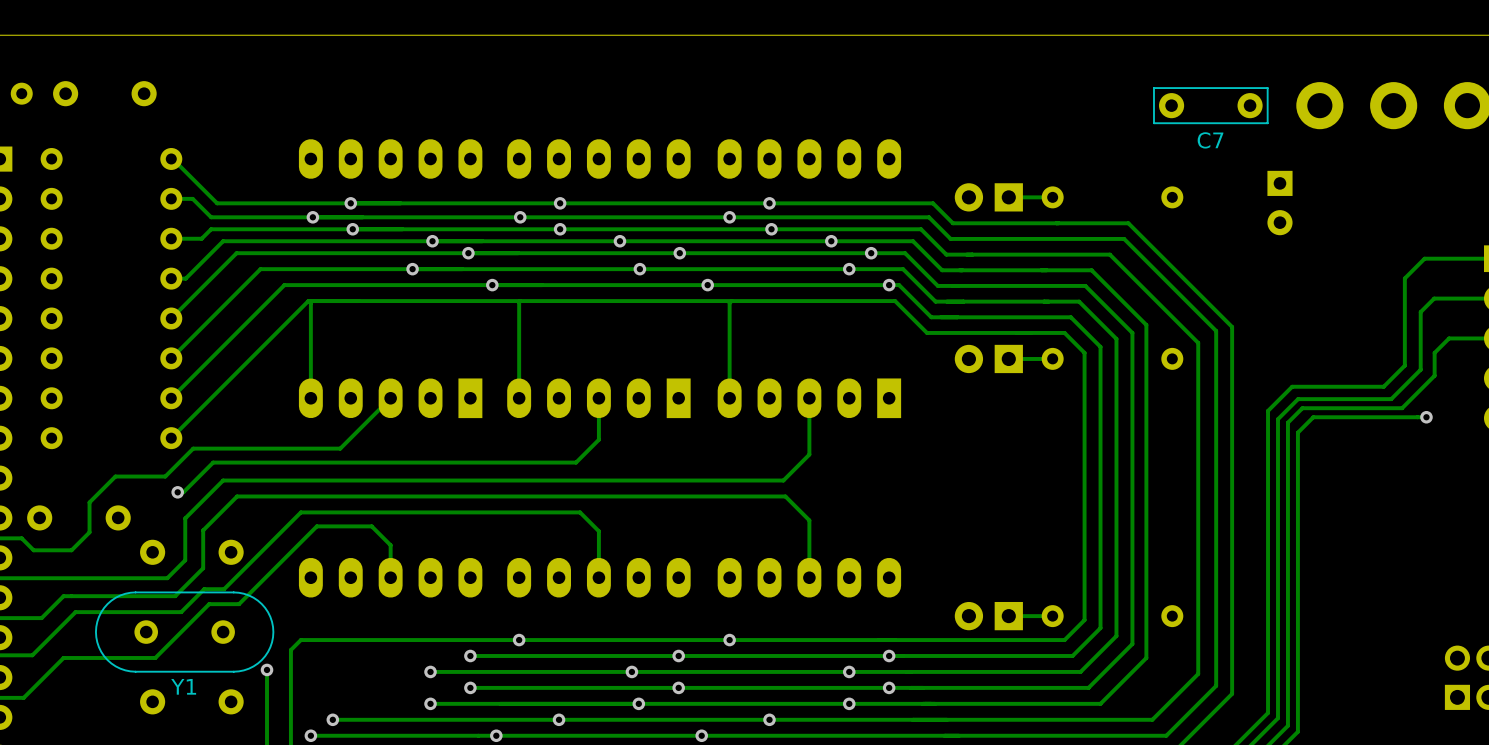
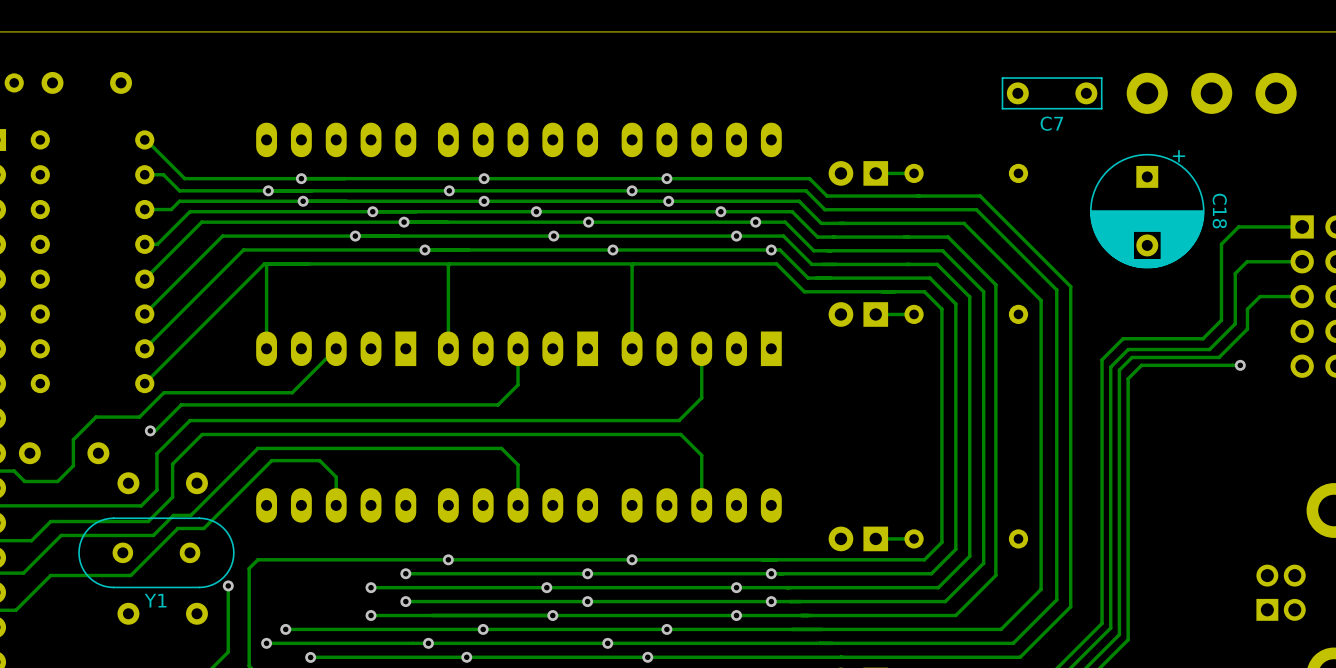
part: (1279, 203) -> none
C18: none -> (1147, 209)

